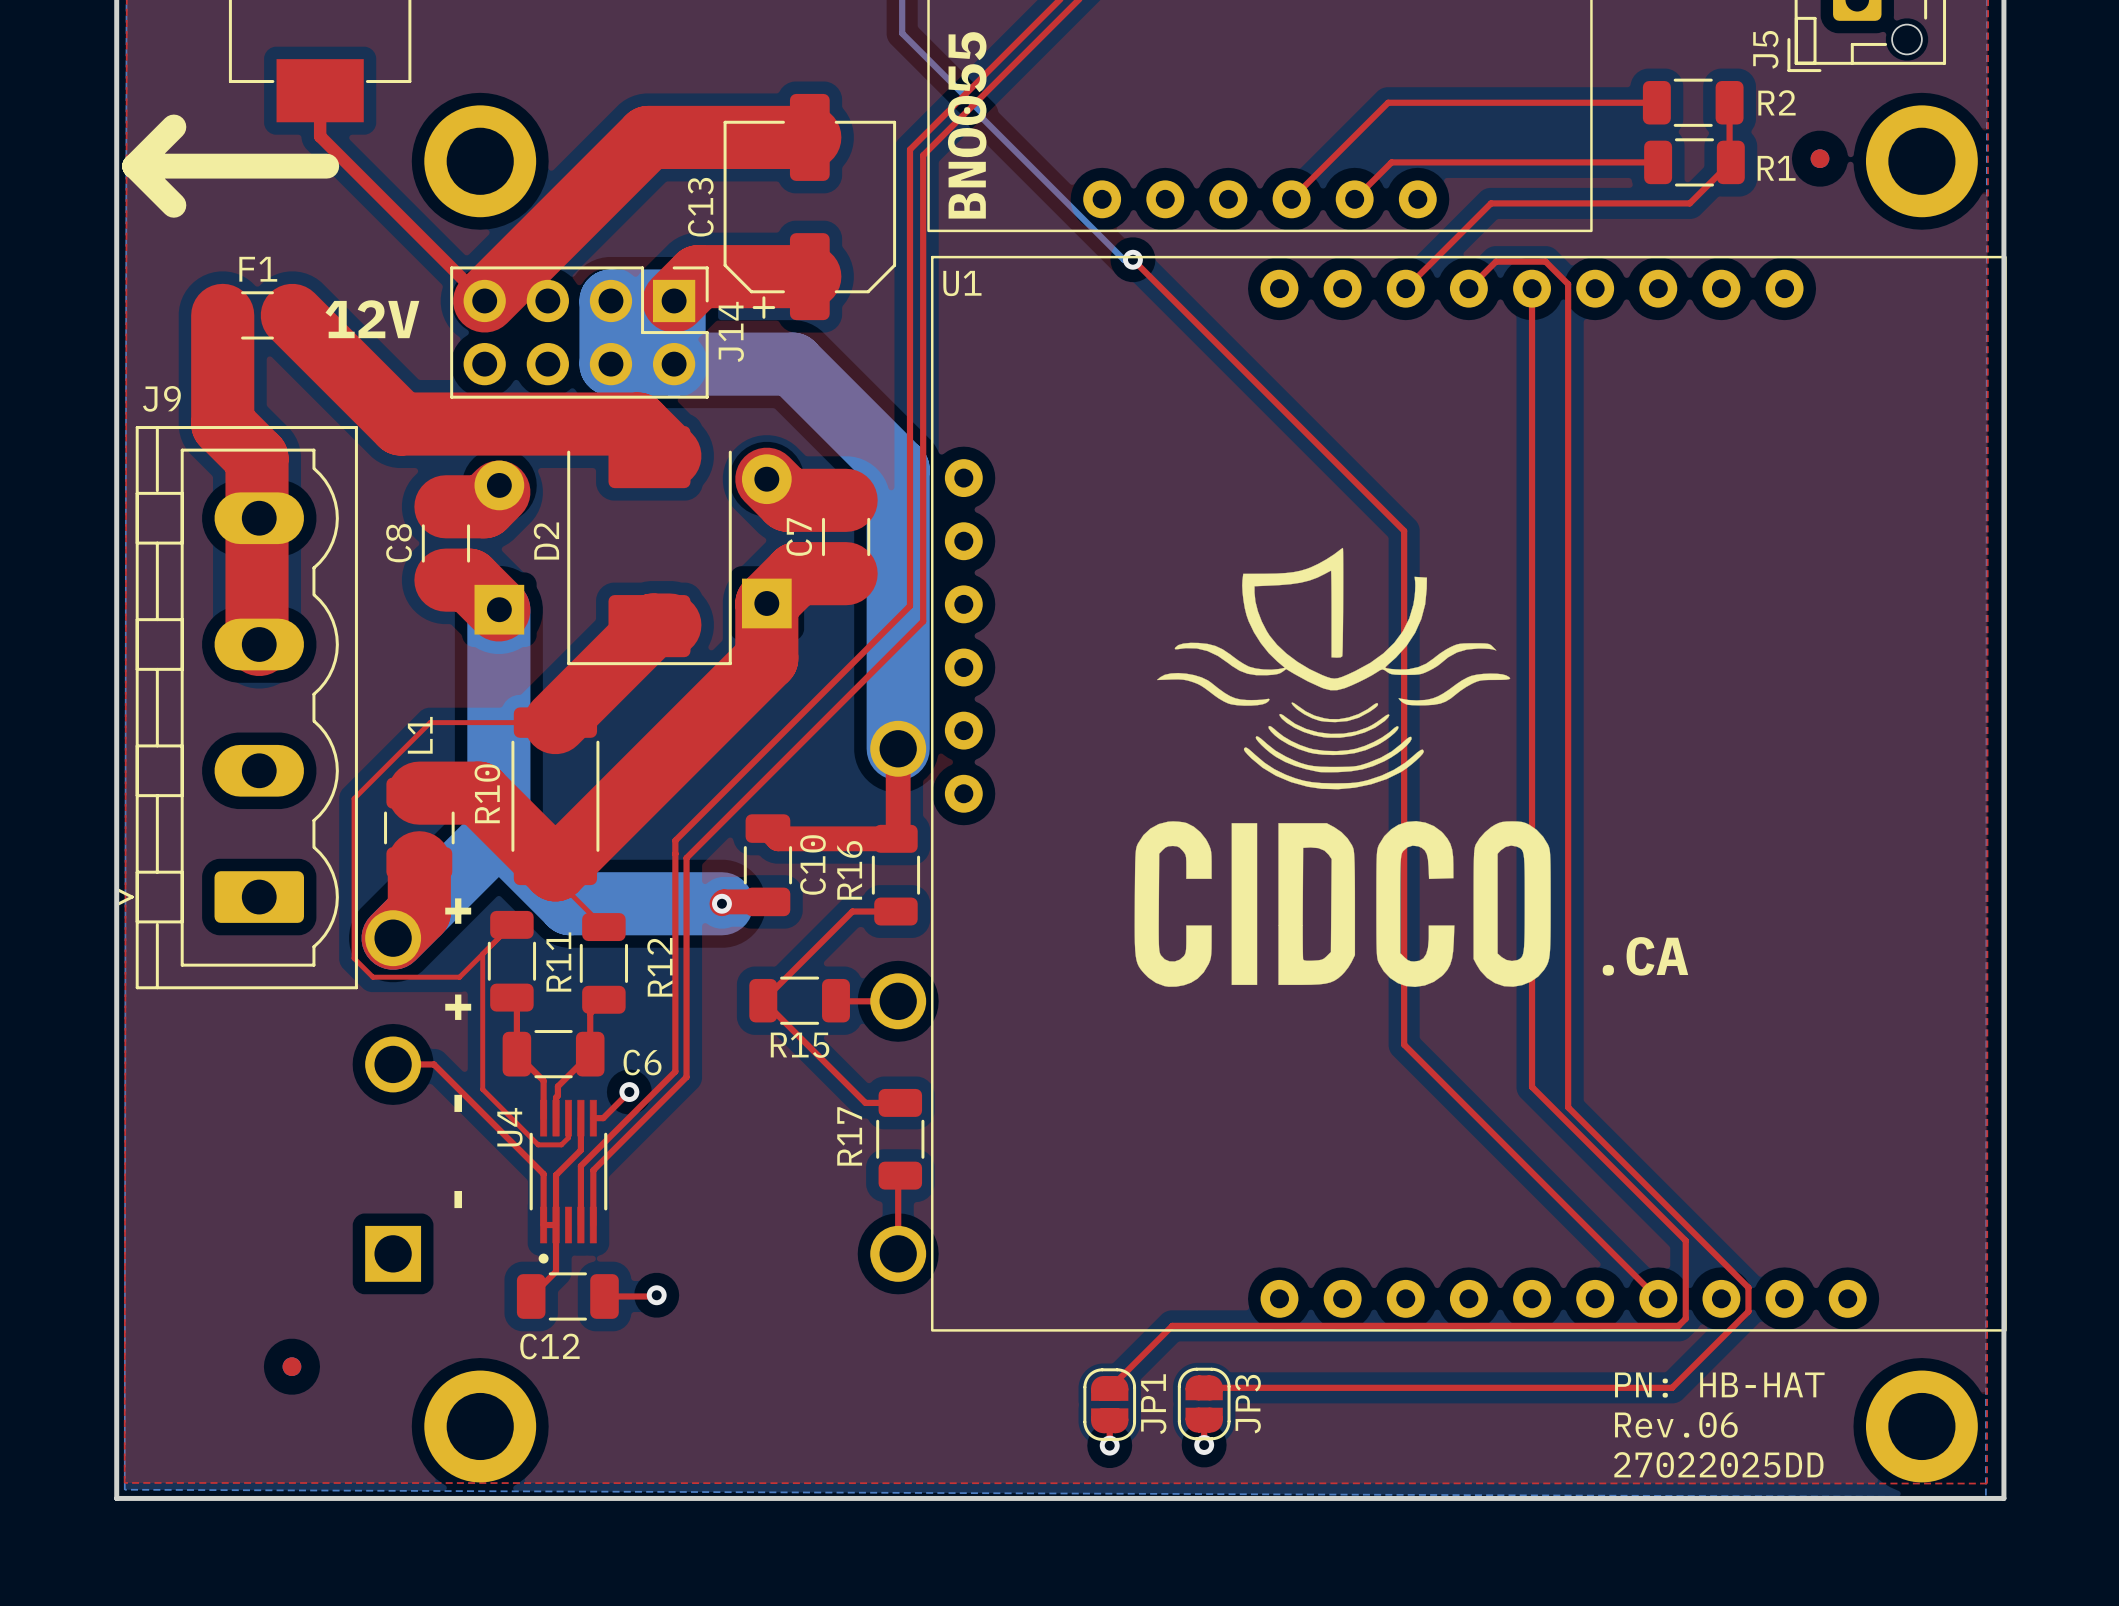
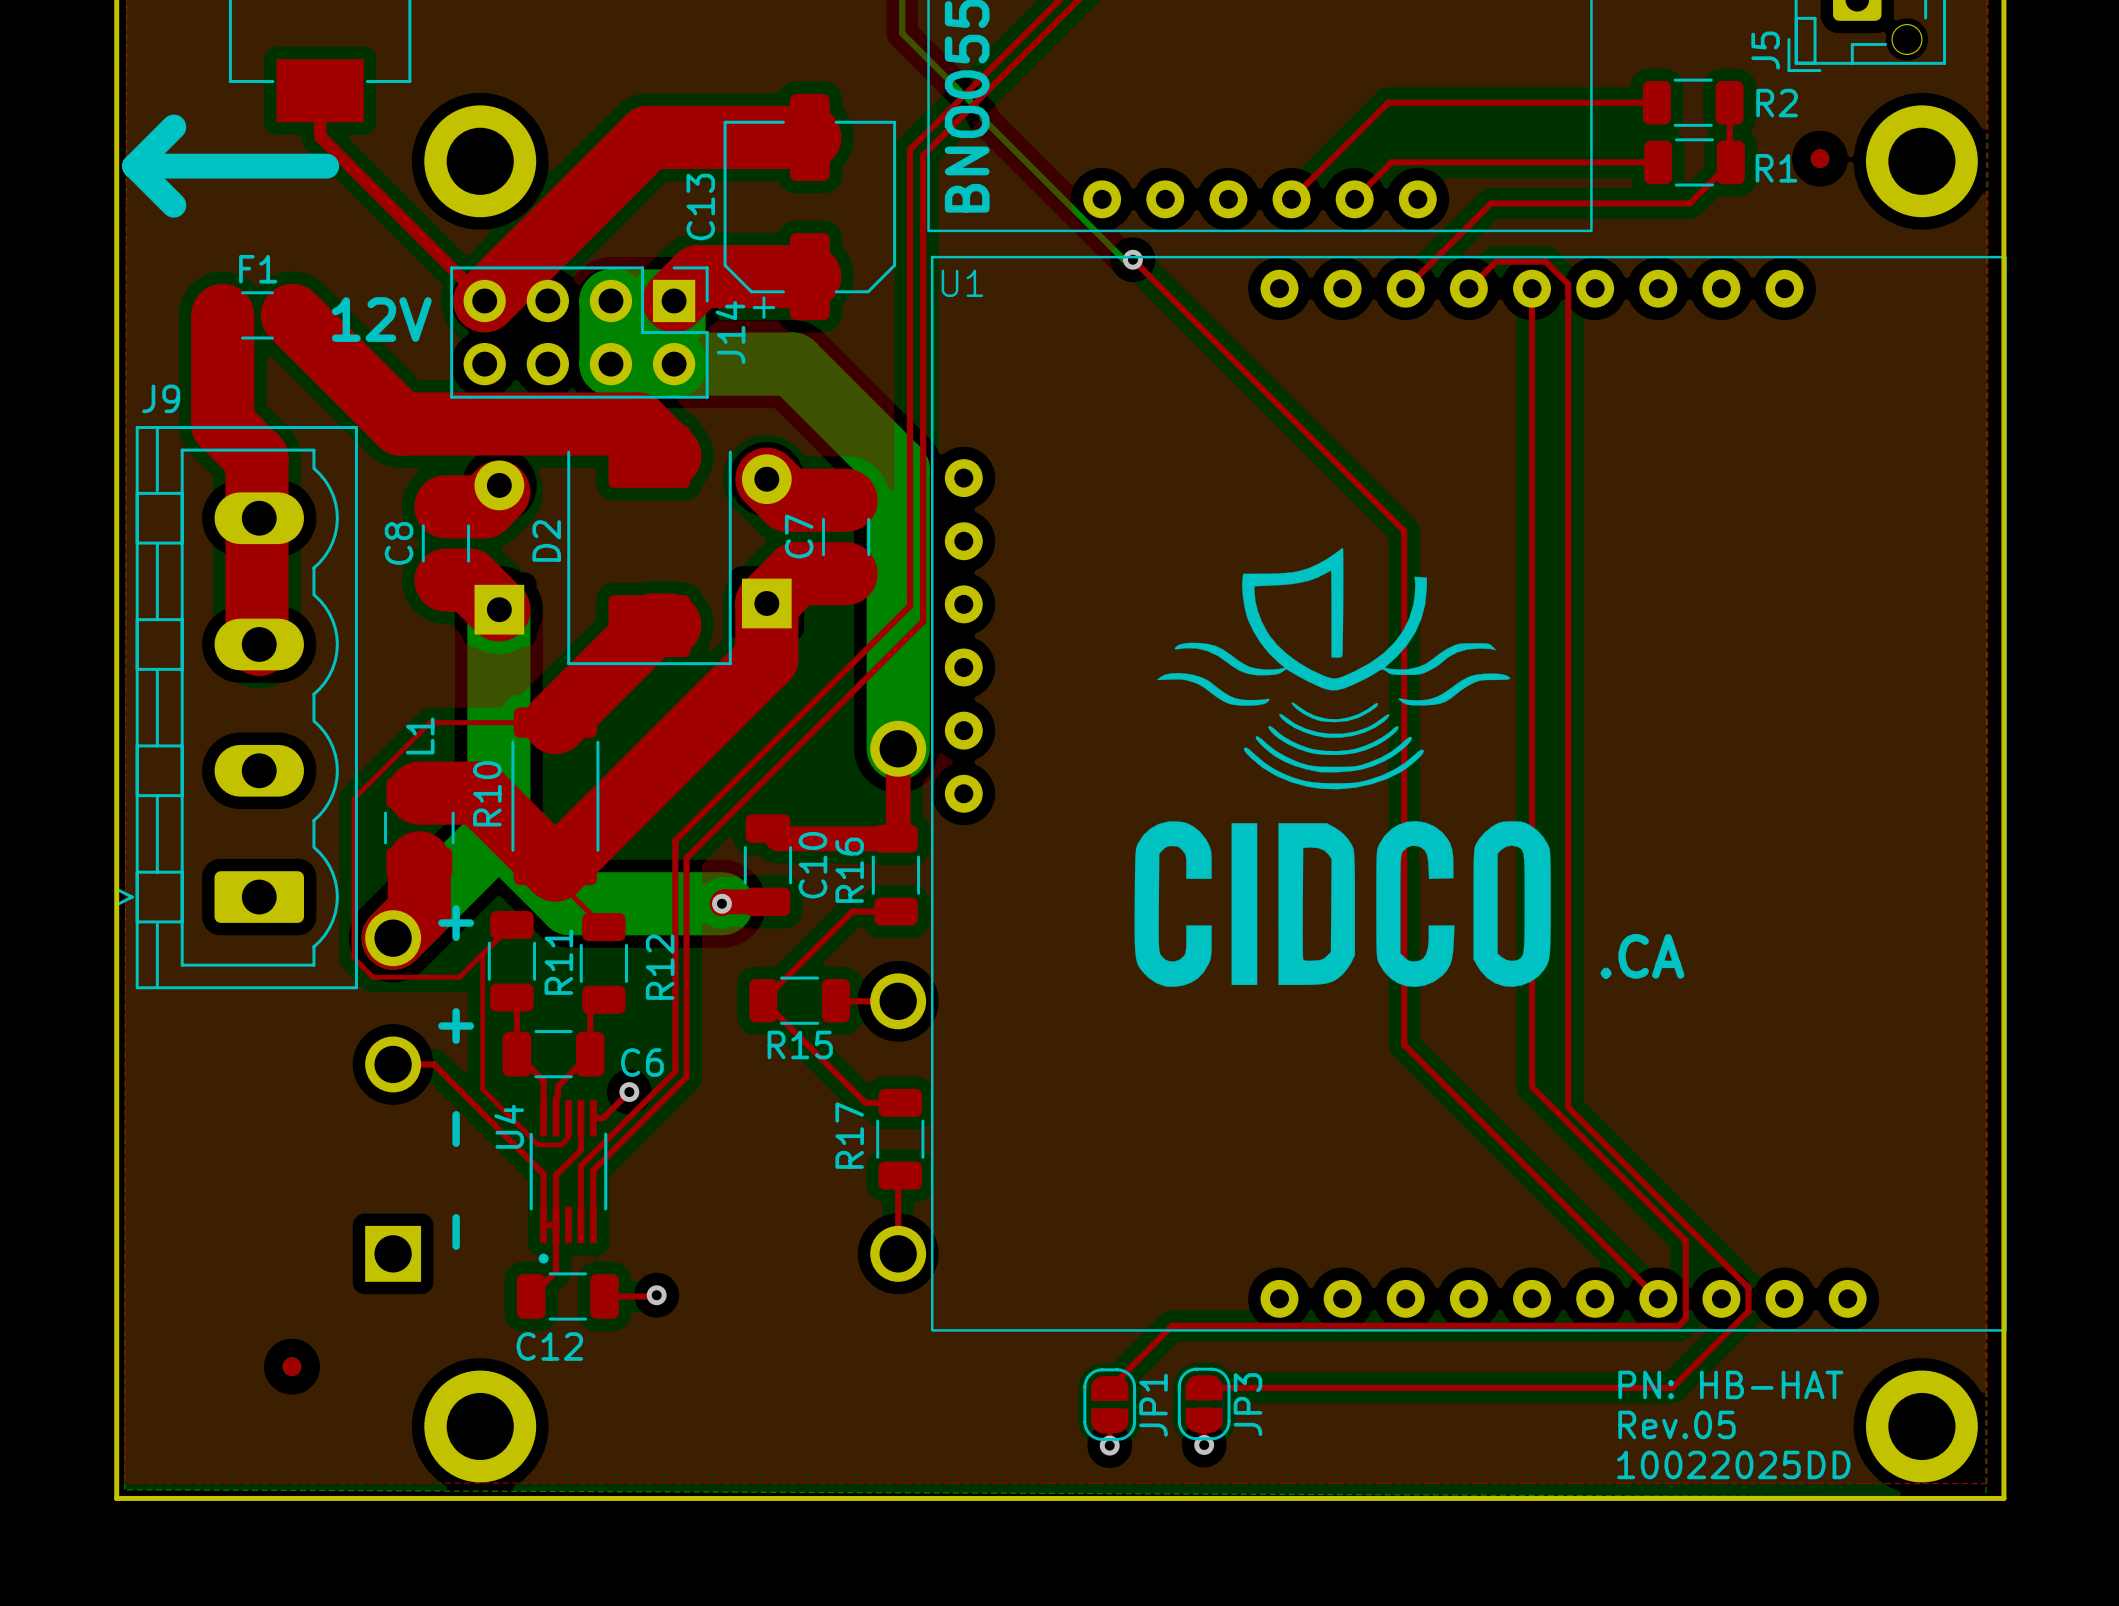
text: Rev.06 (1676, 1424) -> Rev.05 (1677, 1424)
text: 27022025DD (1718, 1464) -> 10022025DD (1733, 1464)

